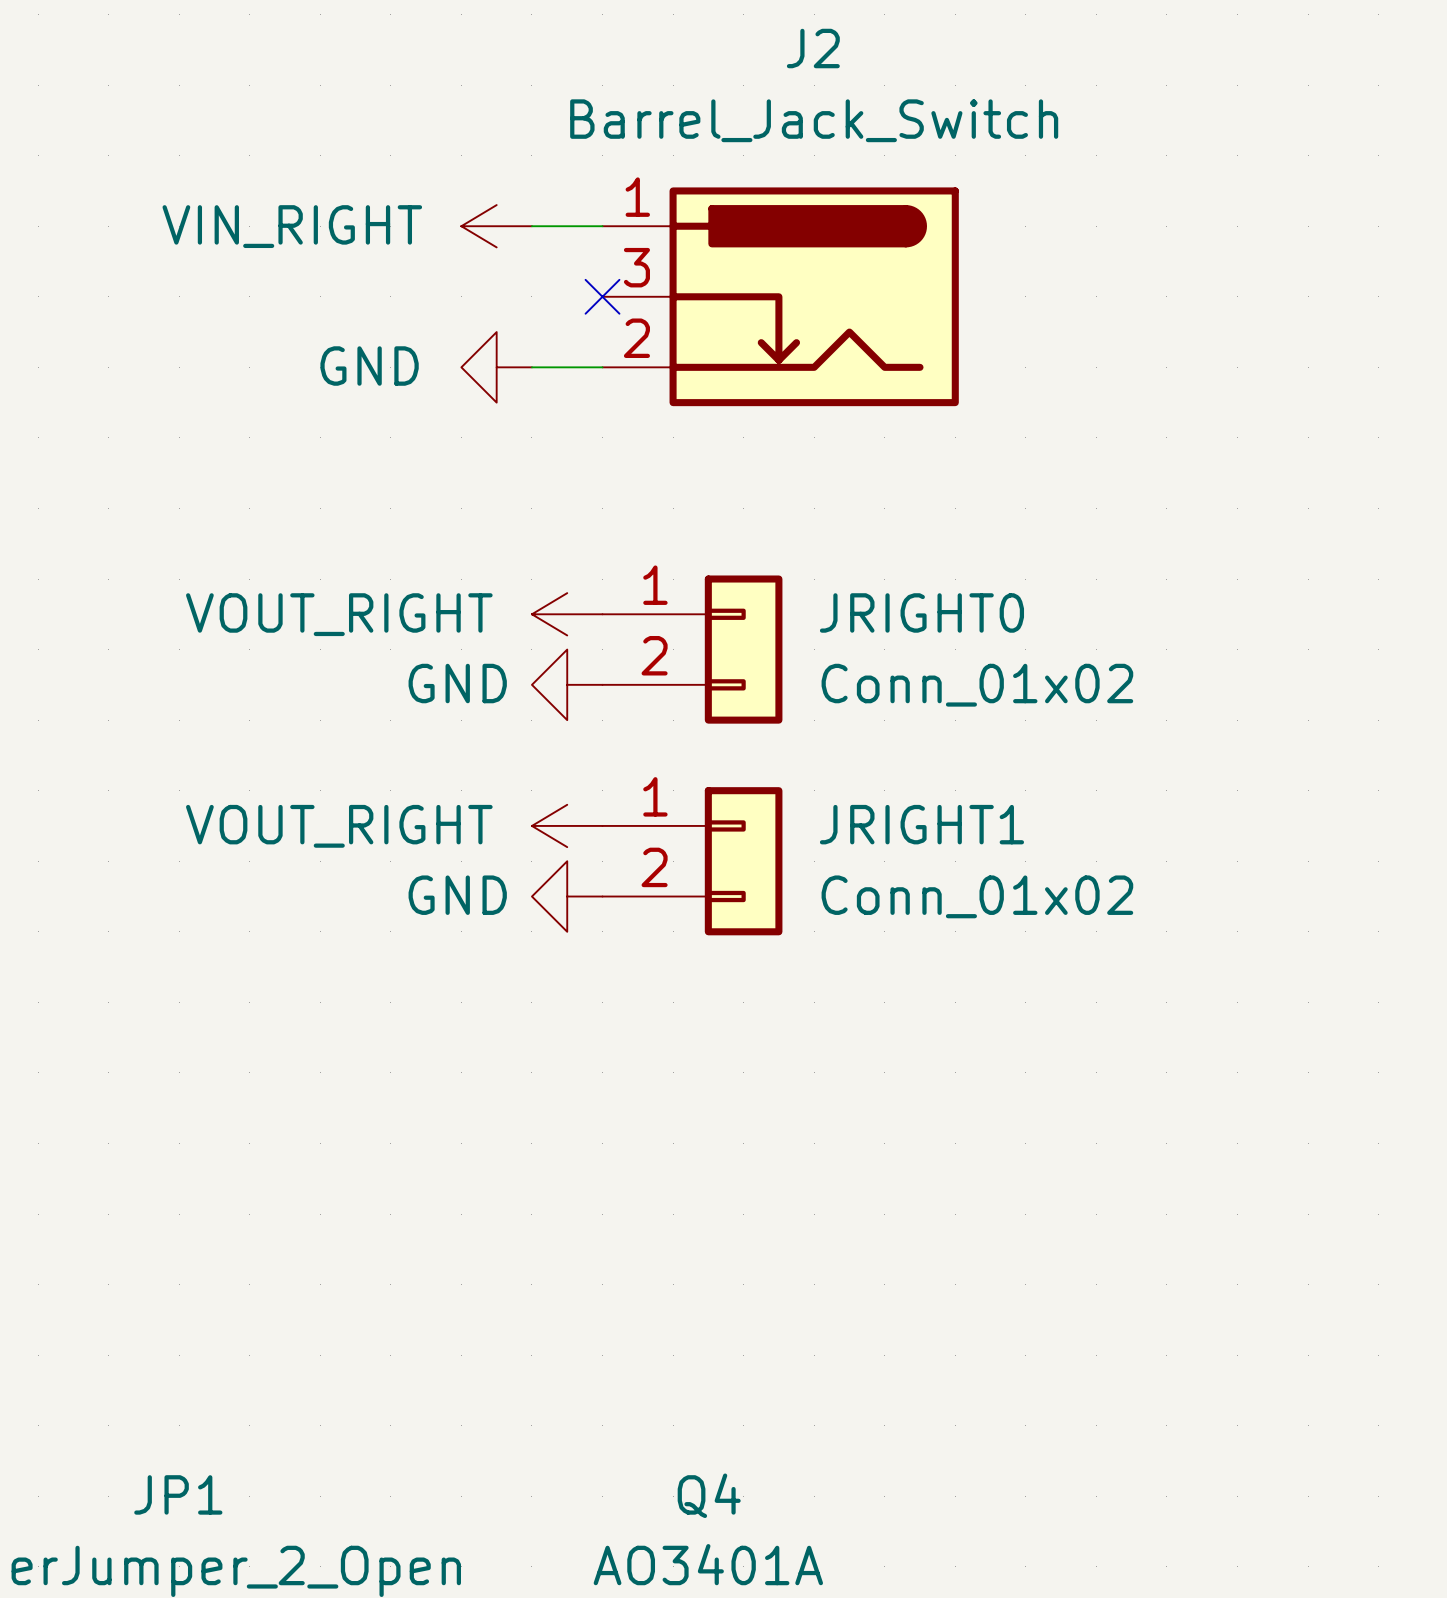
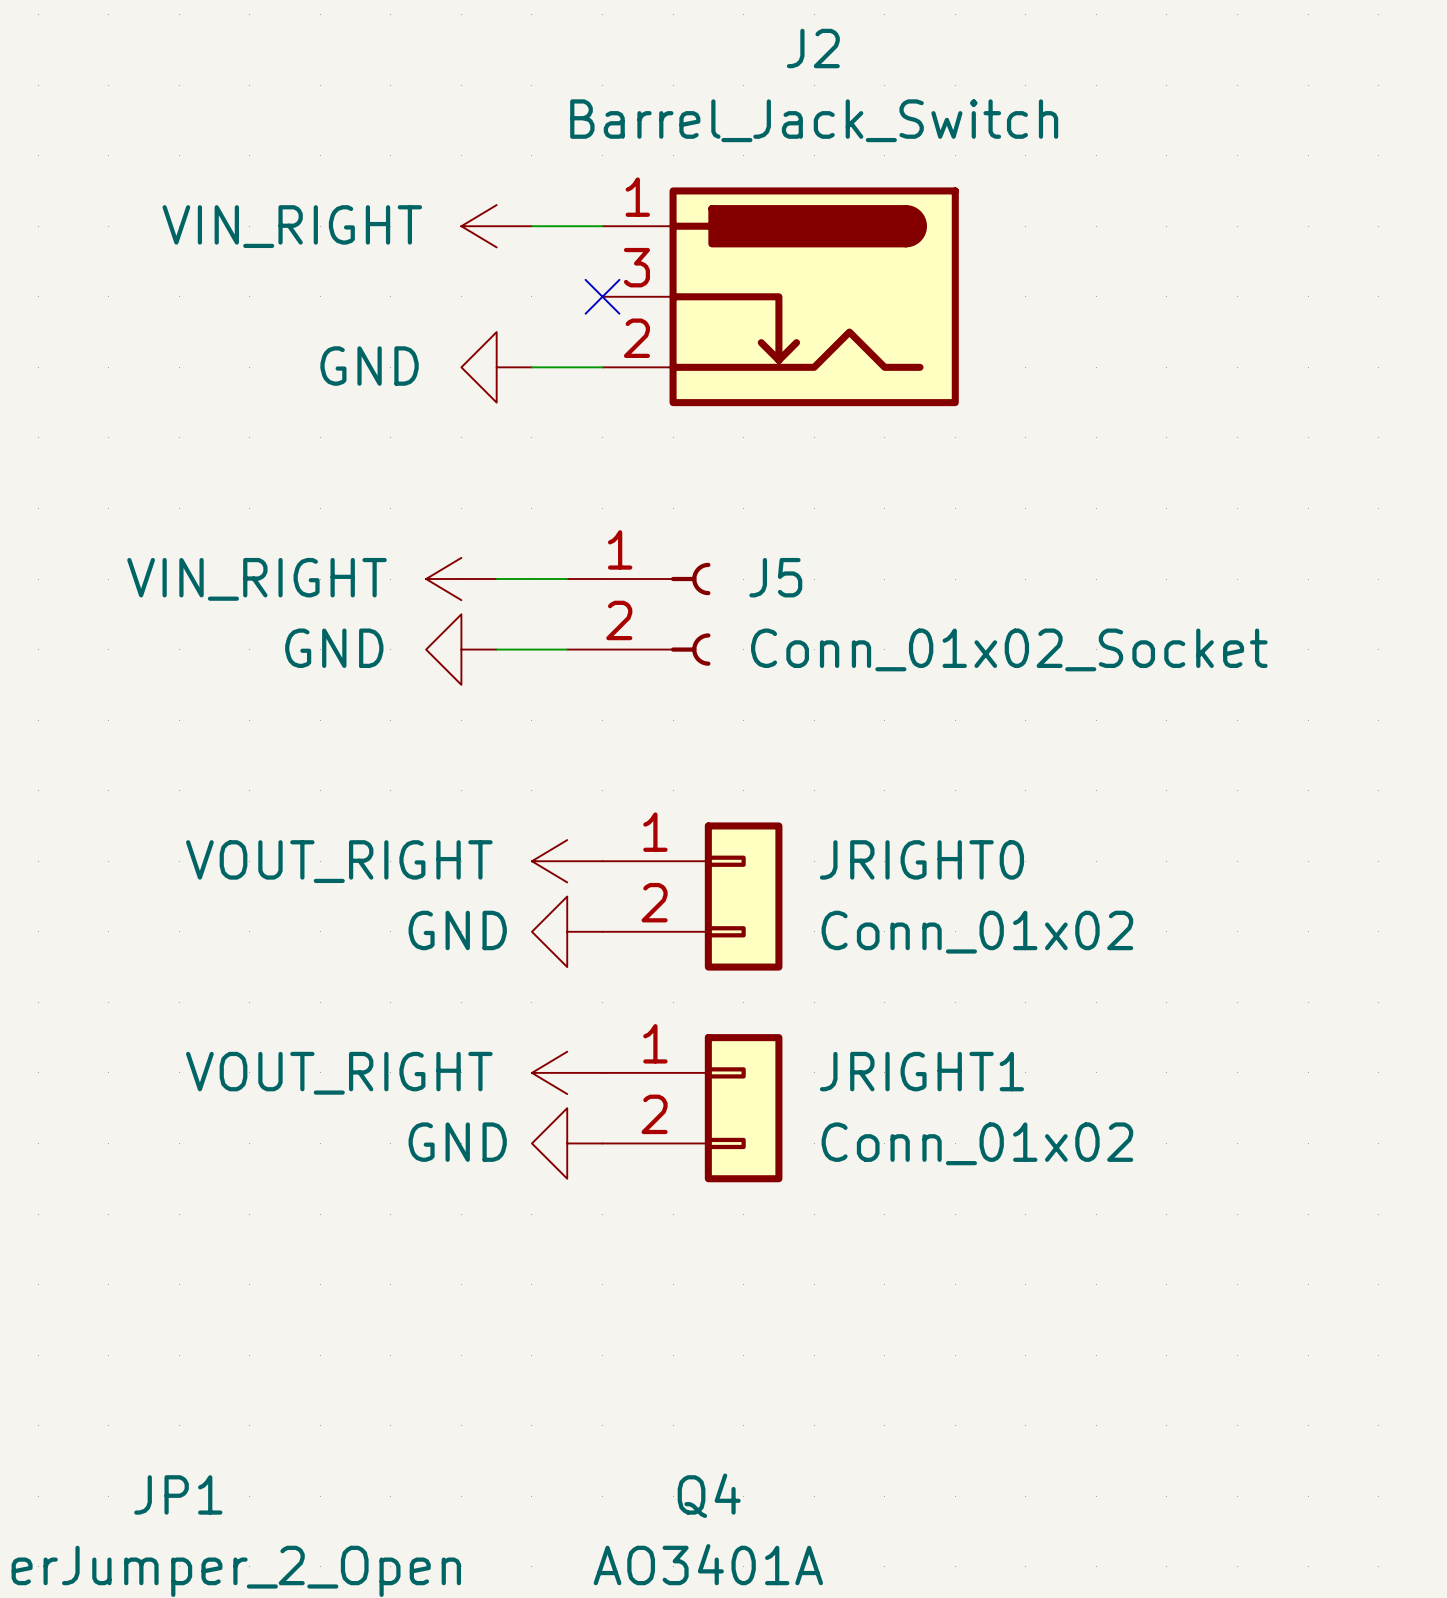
power symbol: none -> VIN_RIGHT (461, 579)
wire: none -> (496, 579) (567, 579)
power symbol: VOUT_RIGHT (567, 614) -> none
J5: none -> Conn_01x02_Socket (638, 614)
wire: none -> (496, 649) (567, 649)
JRIGHT0 position: (692, 649) -> (692, 896)
power symbol text position: GND (457, 683) -> GND (334, 648)
power symbol position: GND (567, 684) -> GND (461, 649)
power symbol position: VOUT_RIGHT (567, 825) -> VOUT_RIGHT (567, 861)
JRIGHT1 position: (692, 861) -> (692, 1108)
power symbol position: GND (567, 896) -> GND (567, 931)
power symbol: none -> VOUT_RIGHT (567, 1072)
power symbol: none -> GND (567, 1143)

